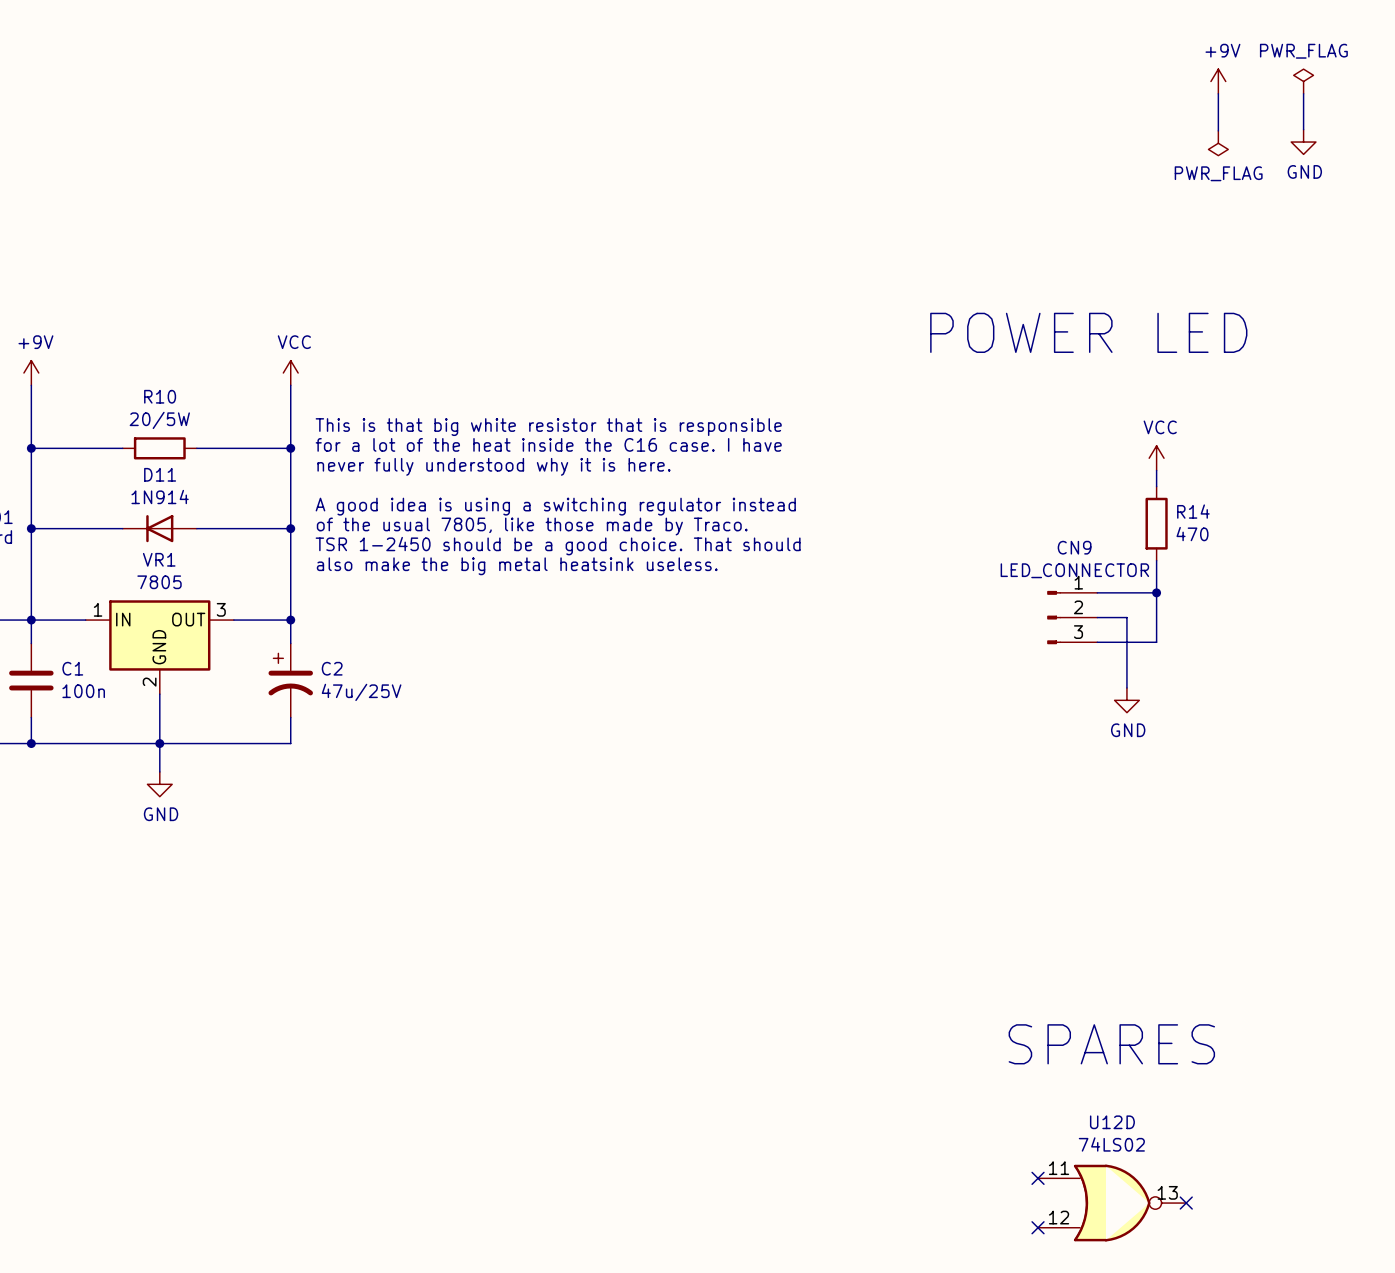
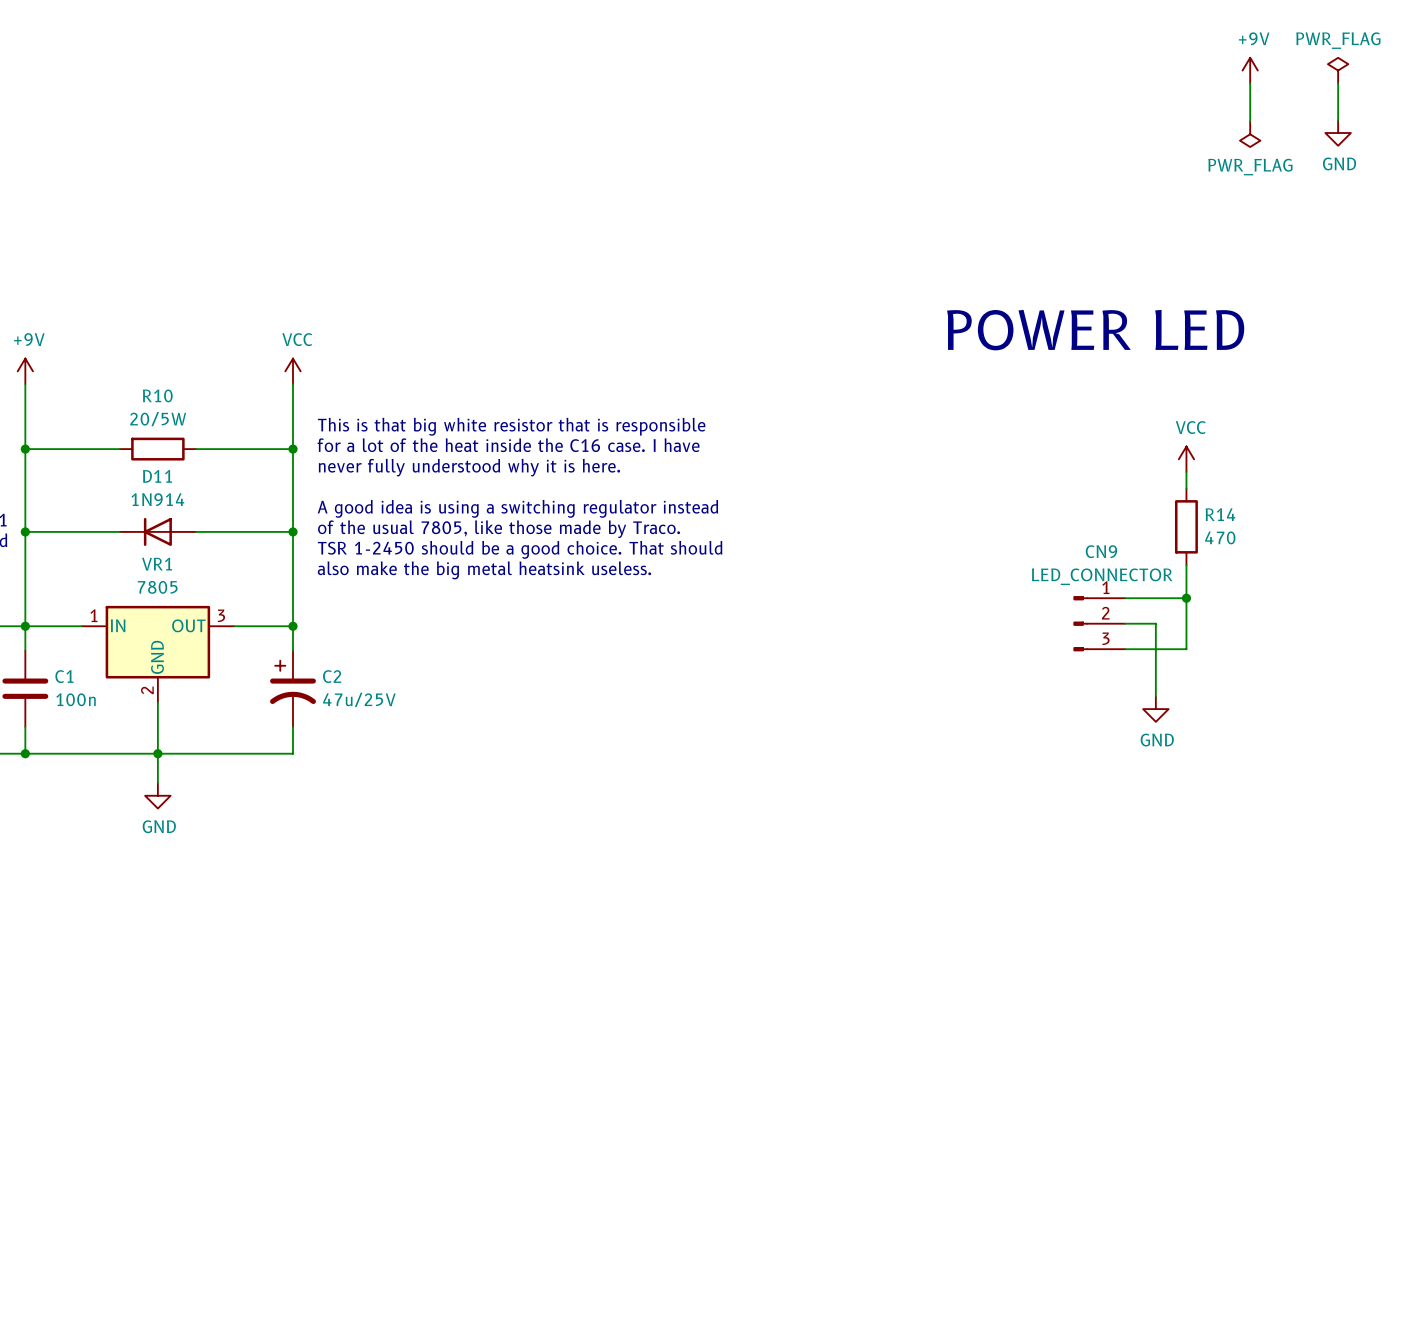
text: SPARES (1111, 1044) -> none
no-connect mark: (1038, 1178) -> none
U12D: 74LS02 (1112, 1203) -> none
no-connect mark: (1186, 1203) -> none
no-connect mark: (1038, 1227) -> none

